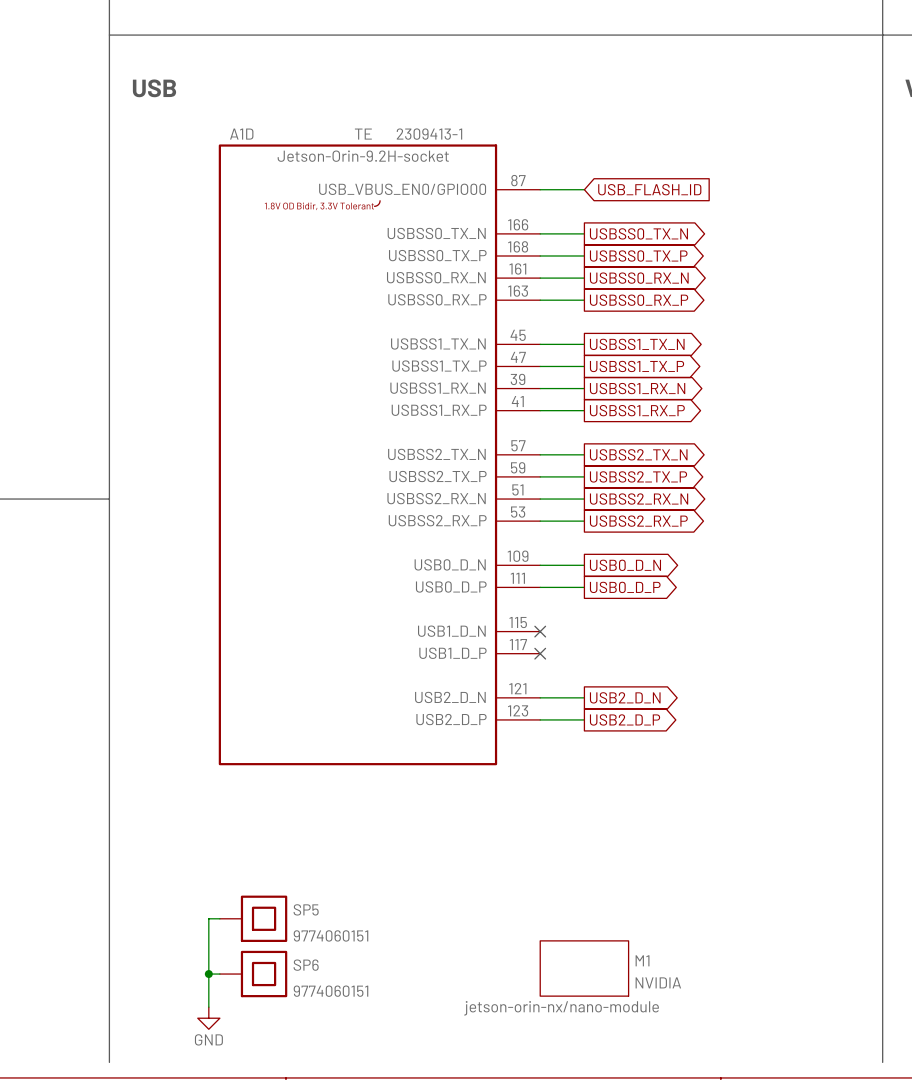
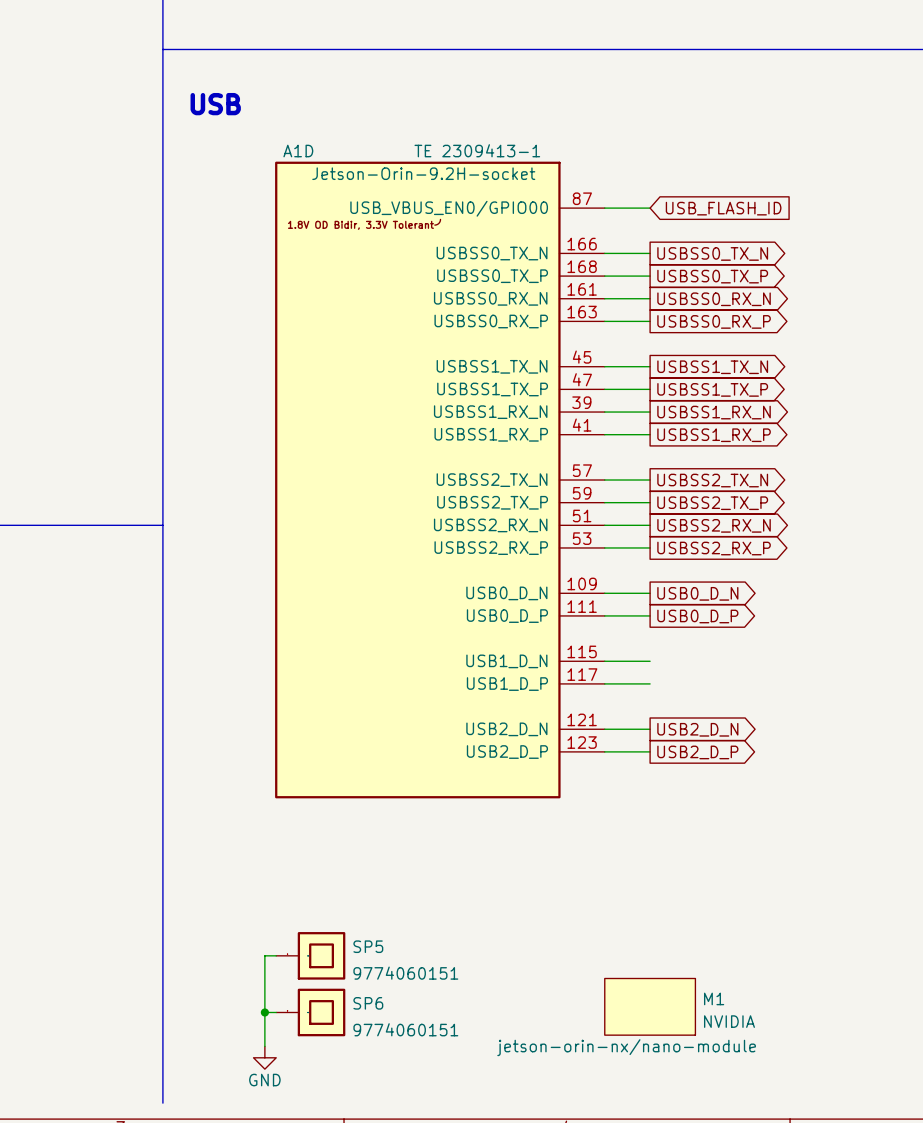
wire: none -> (604, 661) (650, 661)
no-connect mark: (540, 631) -> none
wire: none -> (604, 683) (650, 683)
no-connect mark: (540, 653) -> none

